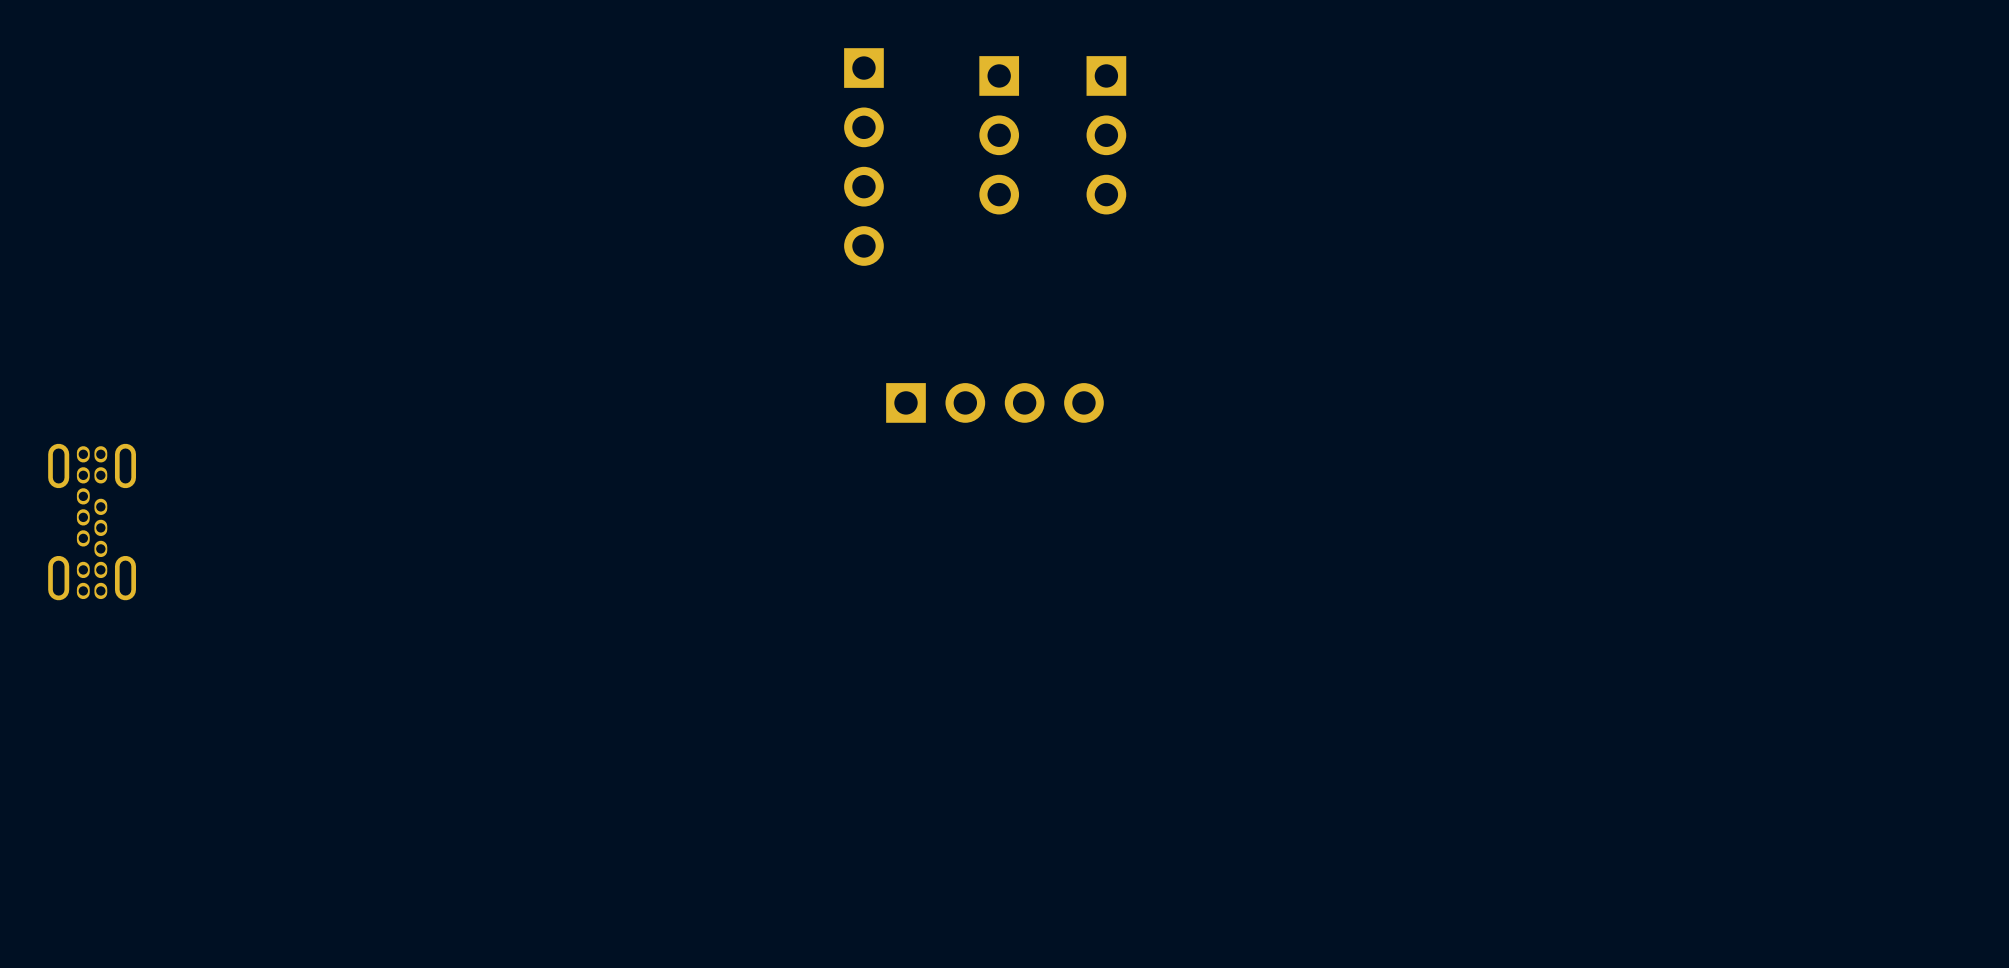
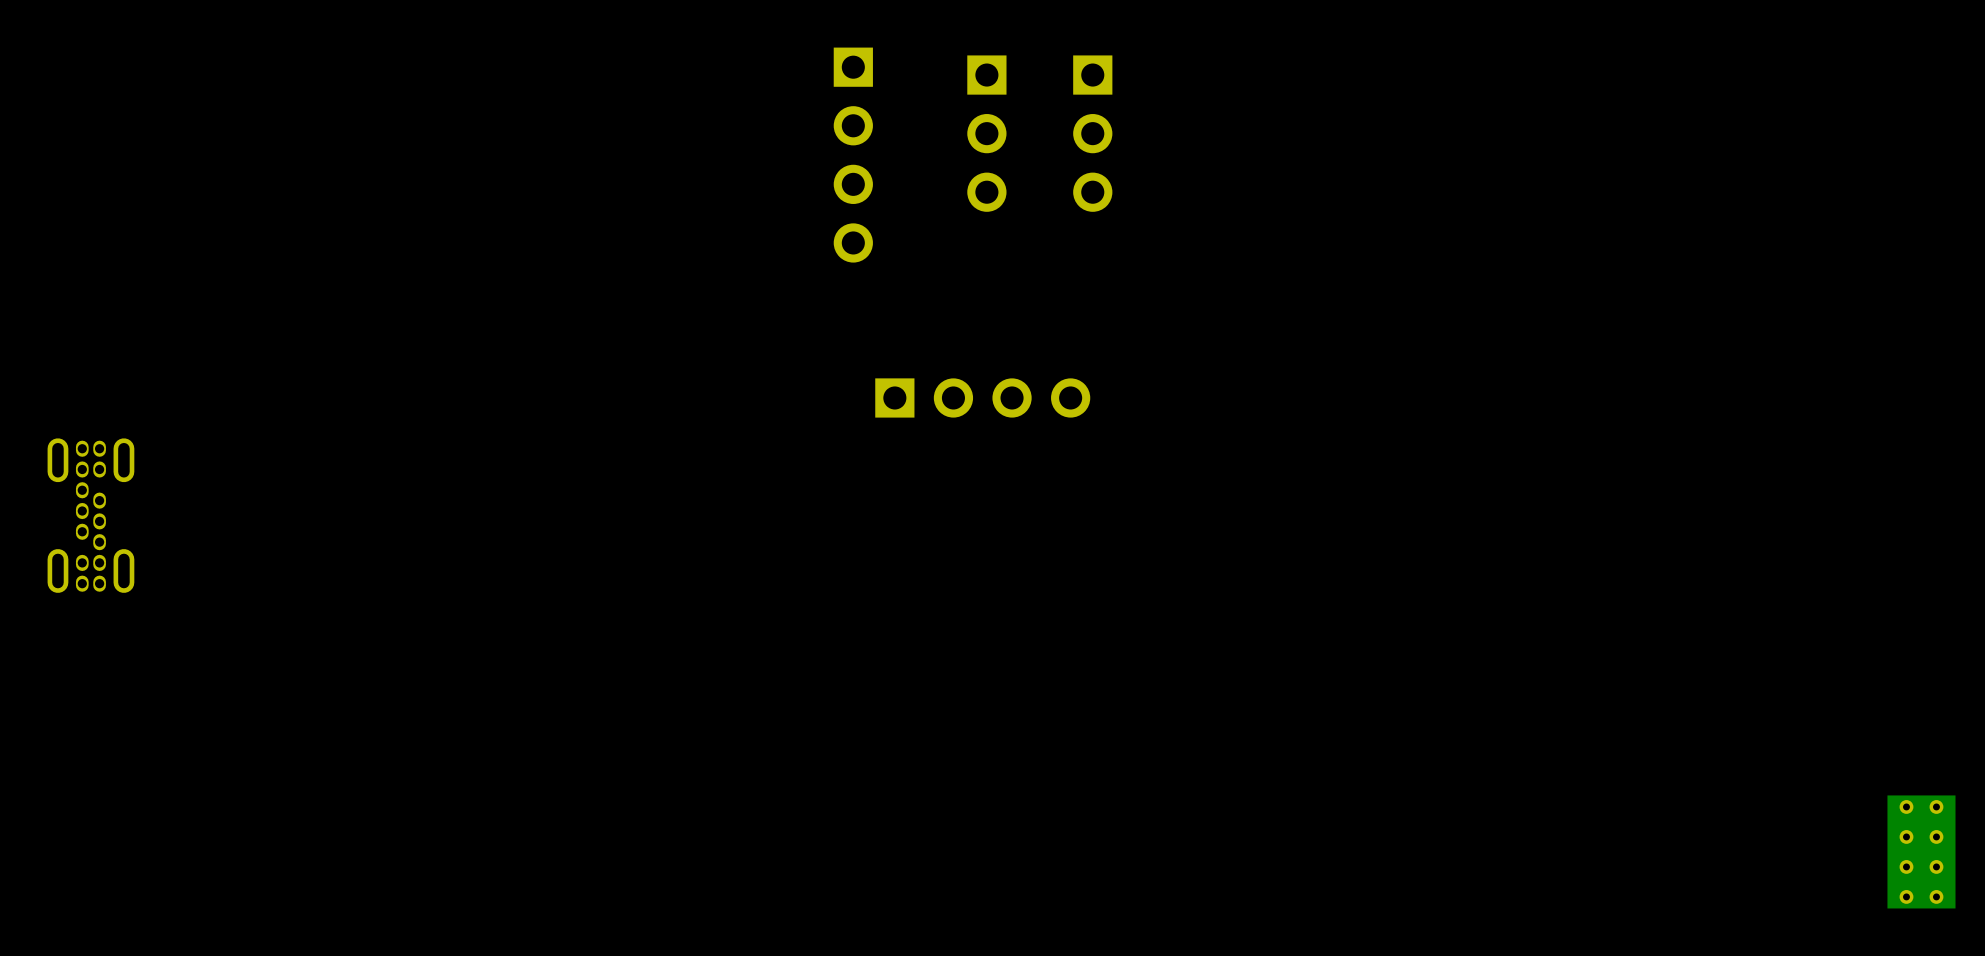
part: none -> (1921, 851)

